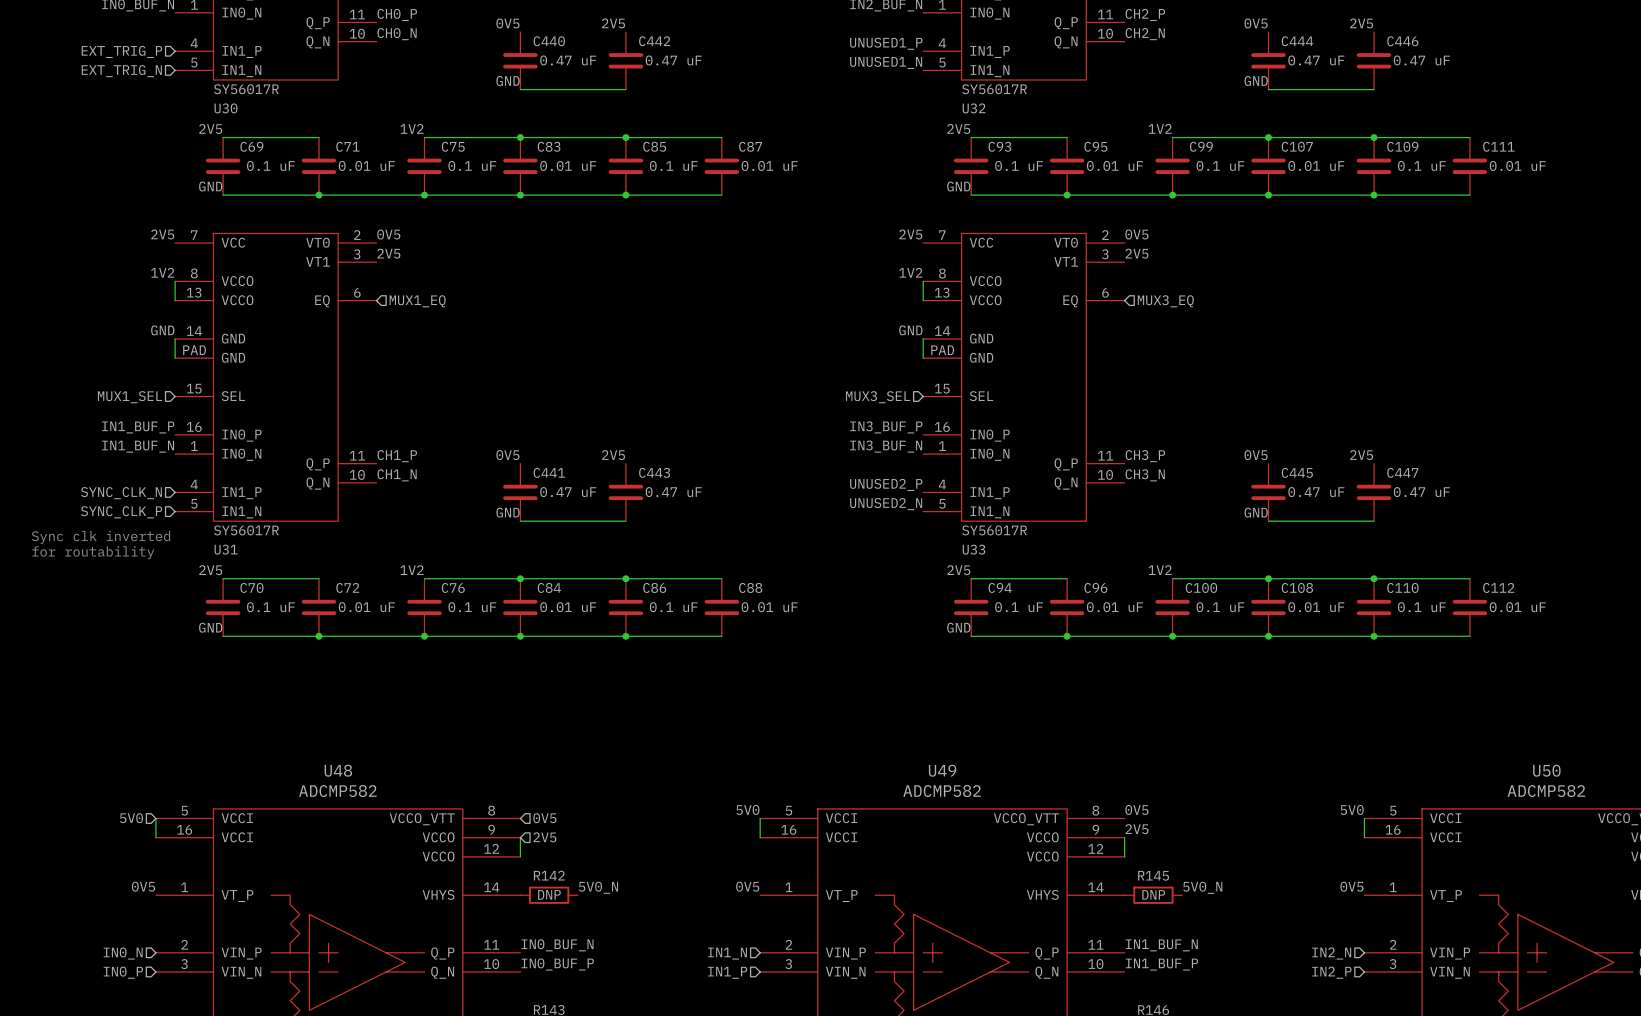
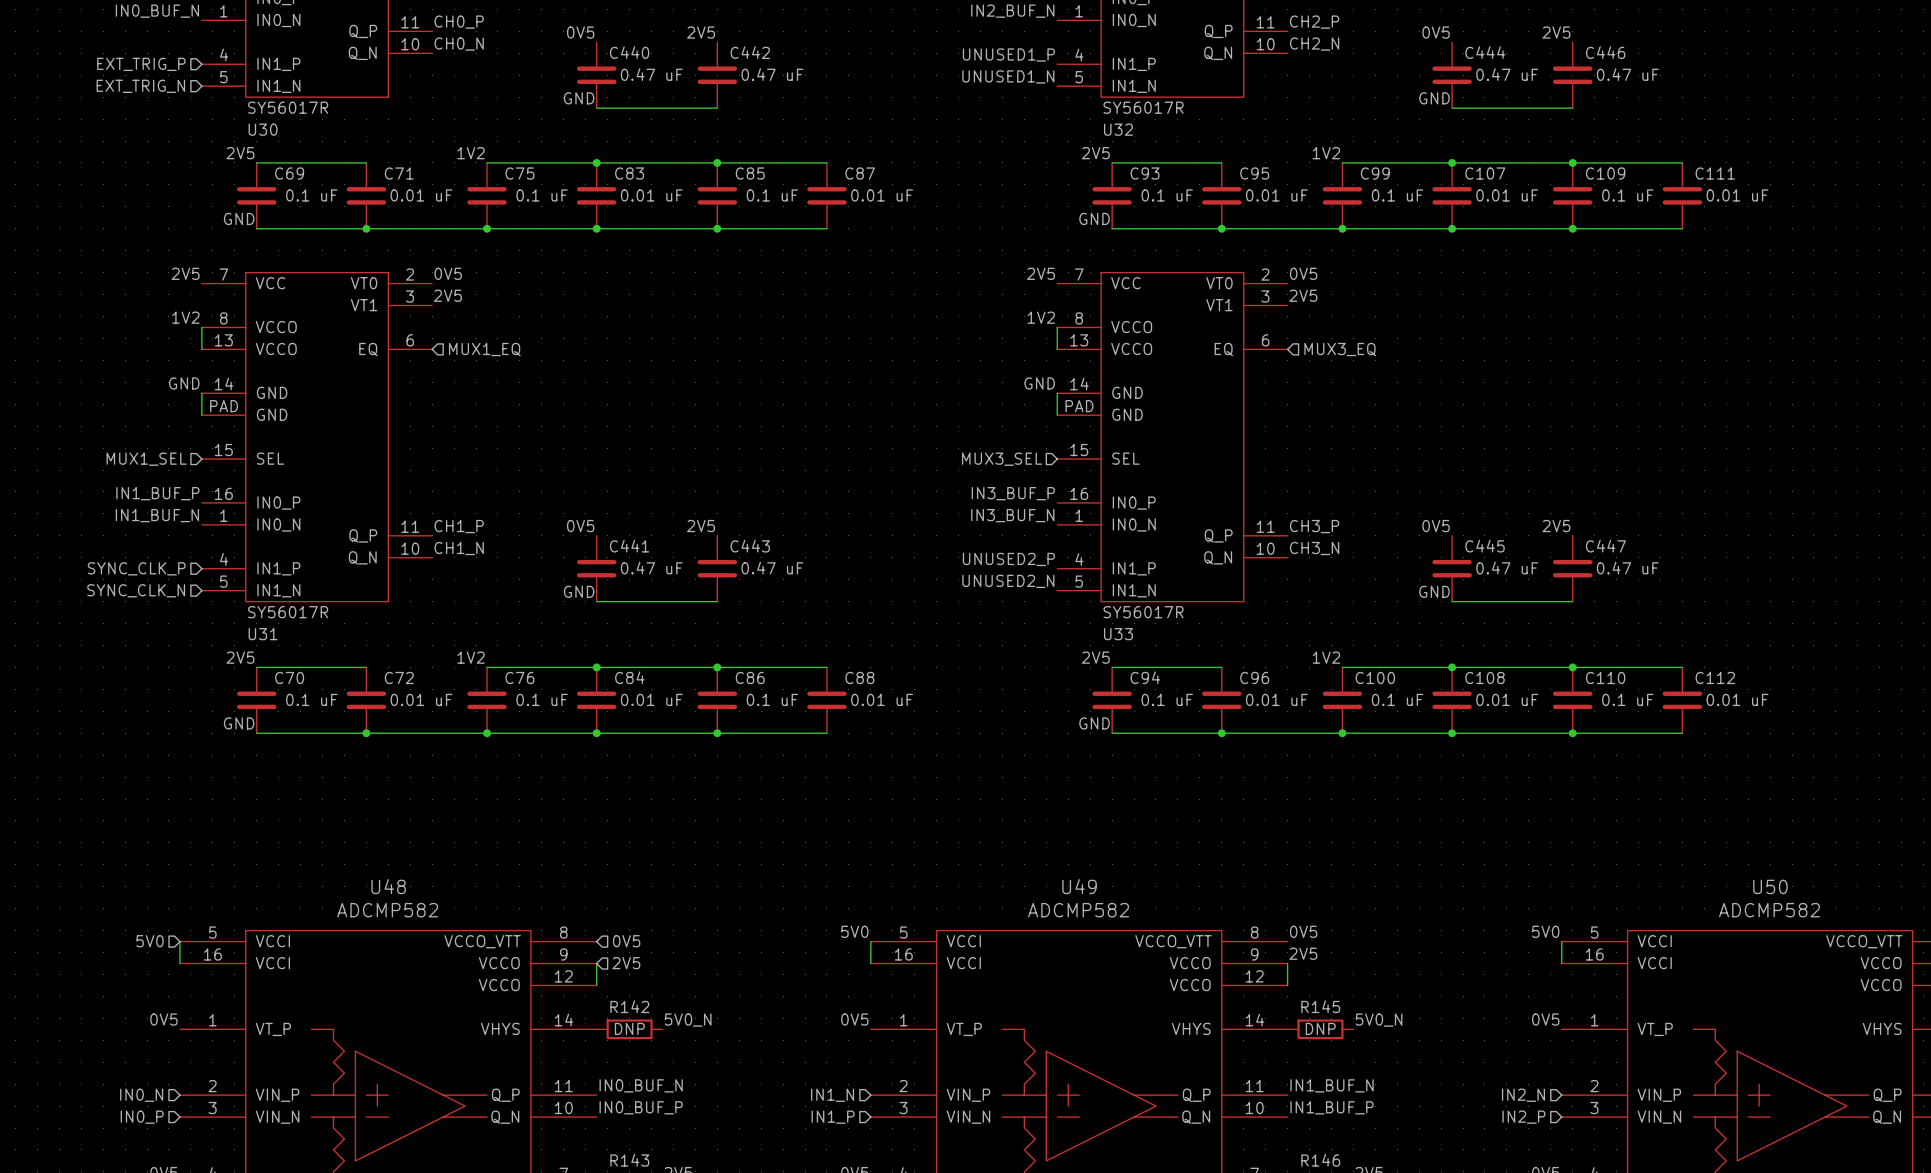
hierarchical label: SYNC_CLK_N (121, 493) -> SYNC_CLK_P (136, 568)
hierarchical label: SYNC_CLK_P (121, 512) -> SYNC_CLK_N (136, 590)
text: Sync clk inverted (100, 537) -> none
text: for routability (93, 552) -> none

